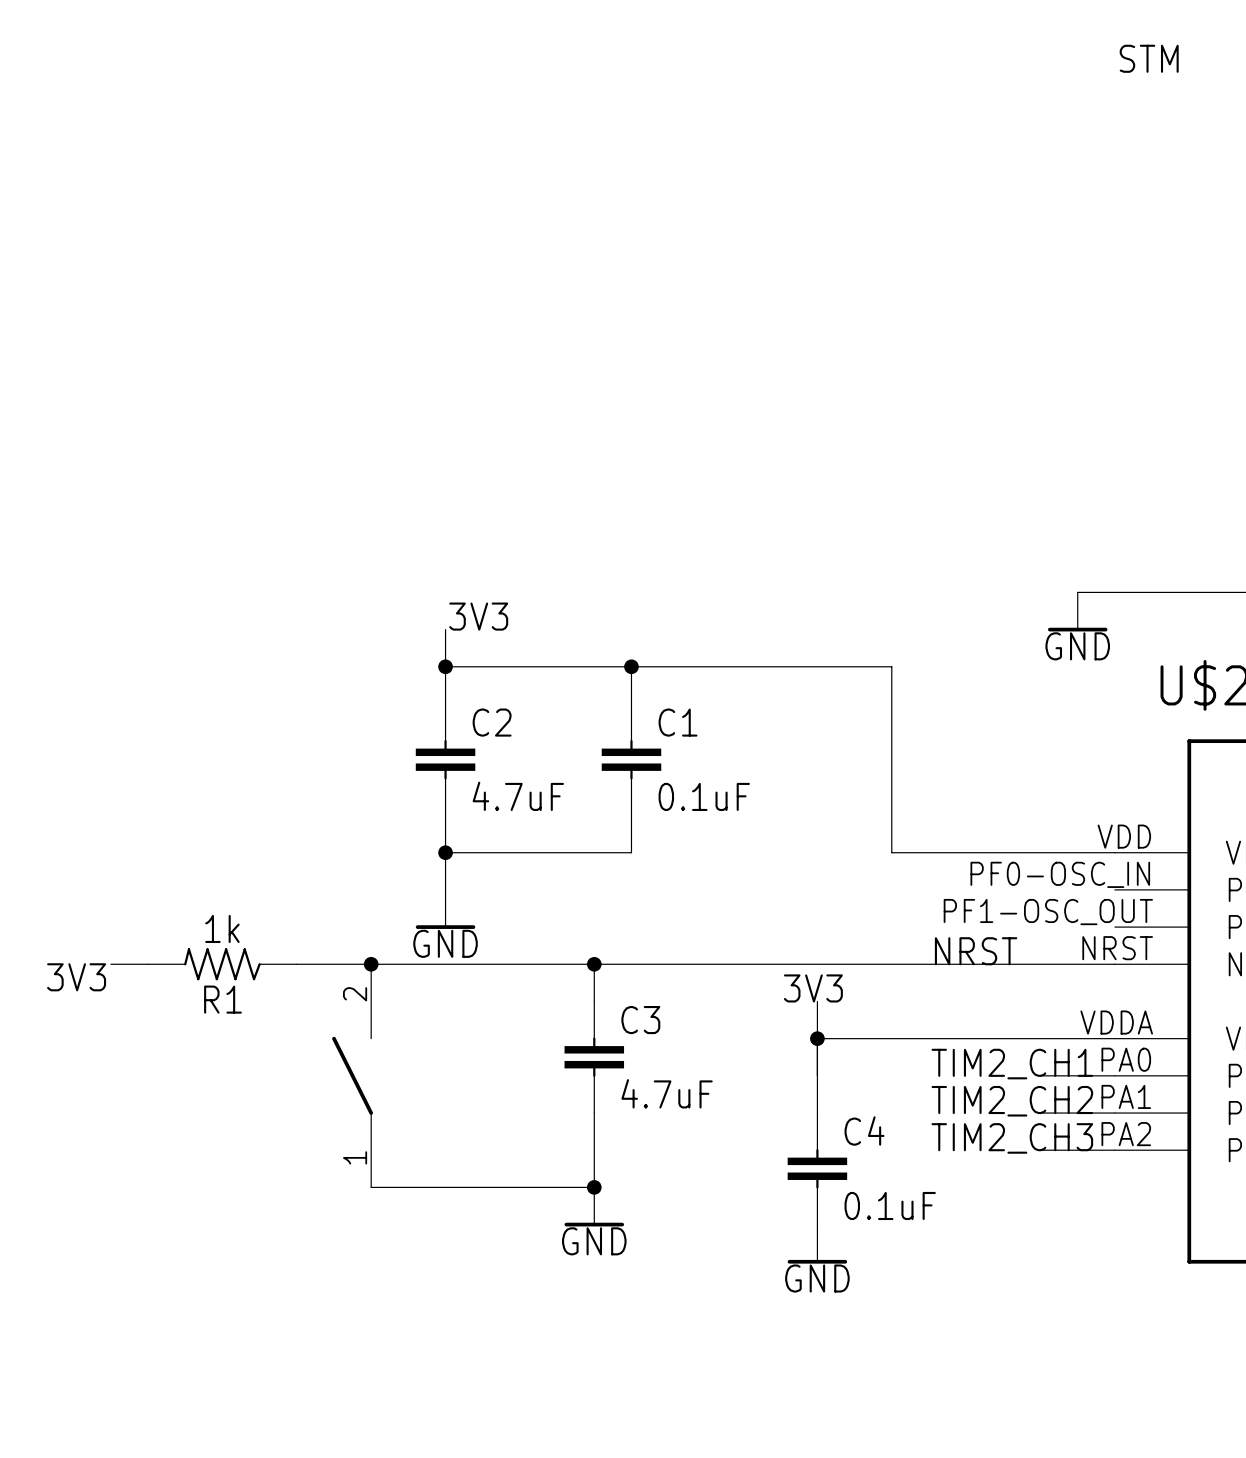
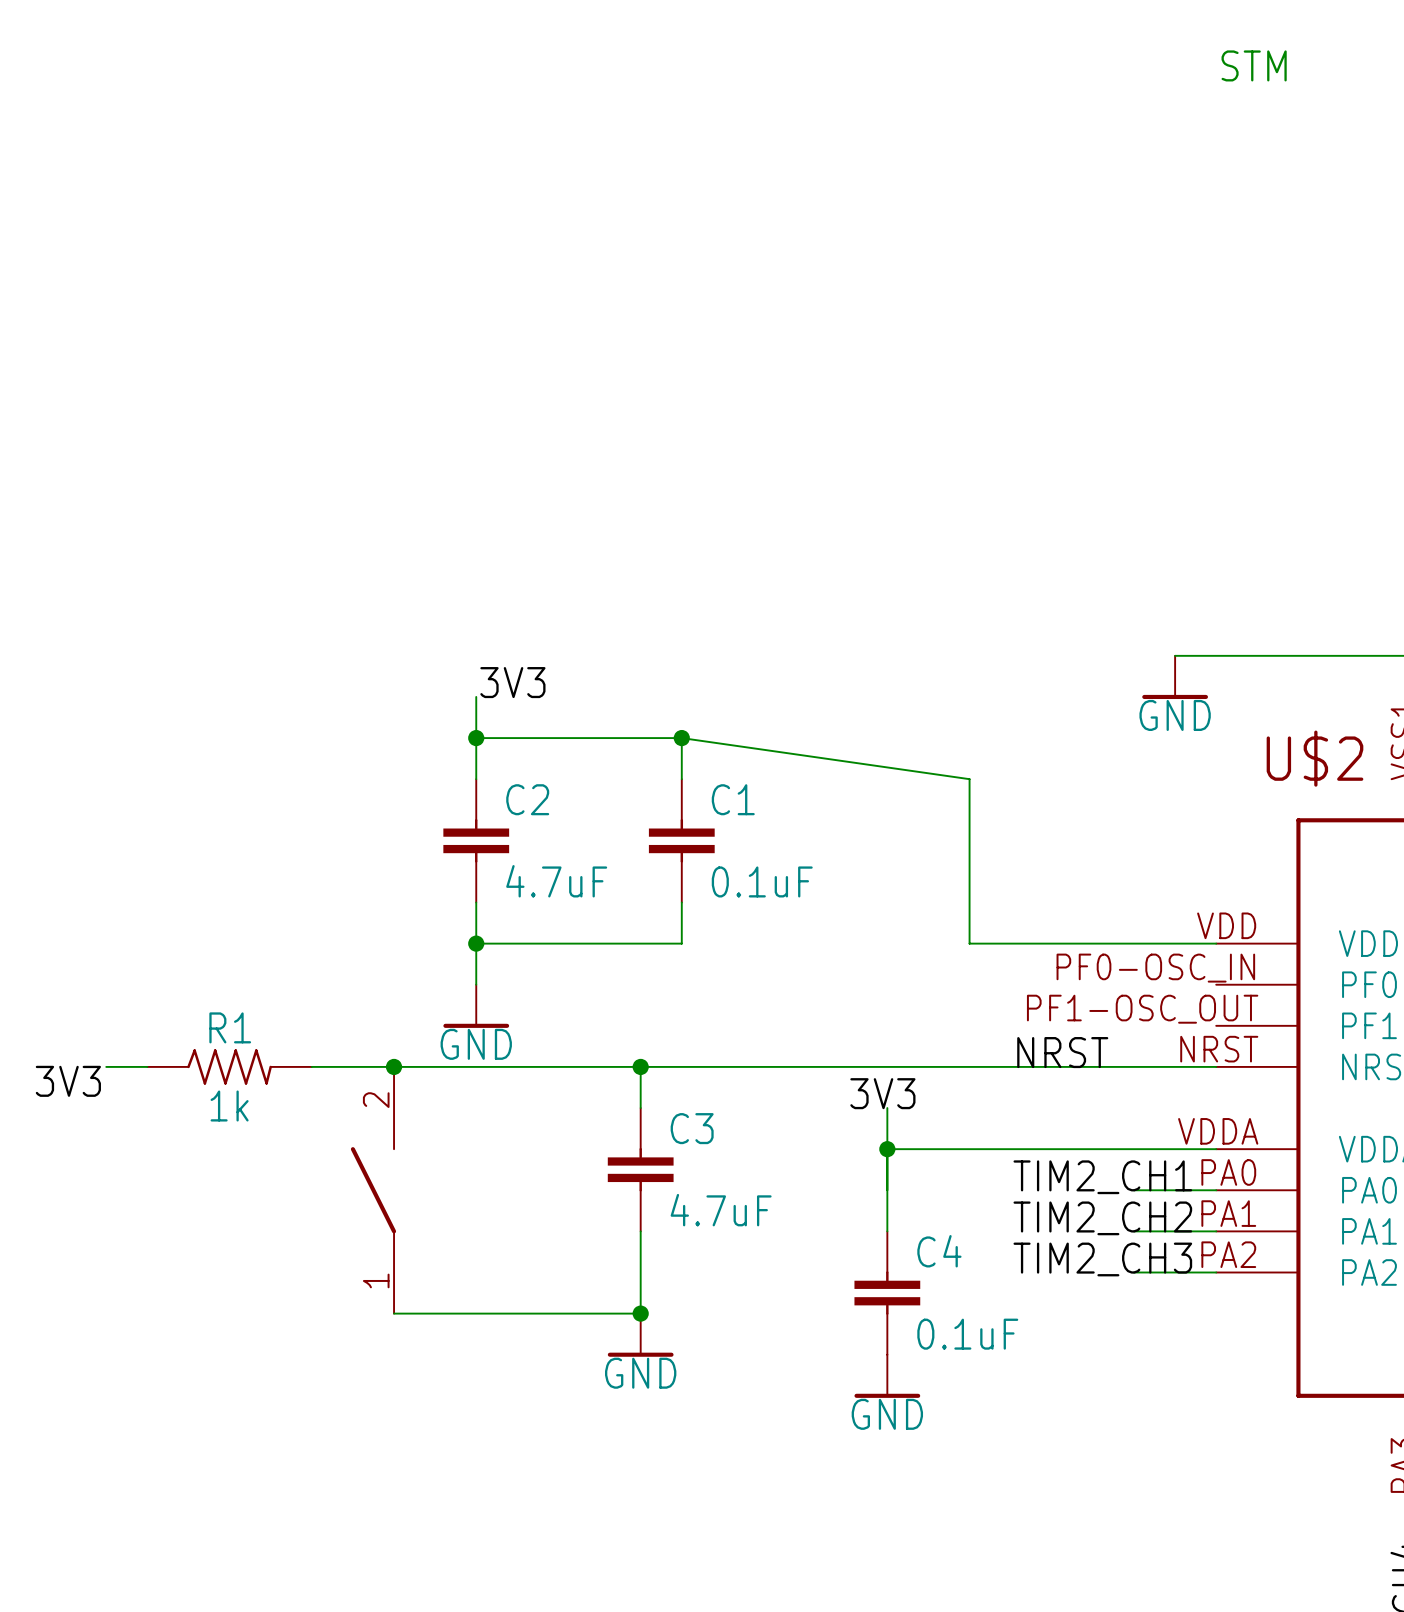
wire: (631, 666) (891, 666) (891, 703) -> (681, 738) (969, 779)
R1 rotation: 0° (222, 964) -> 180° (229, 1066)

